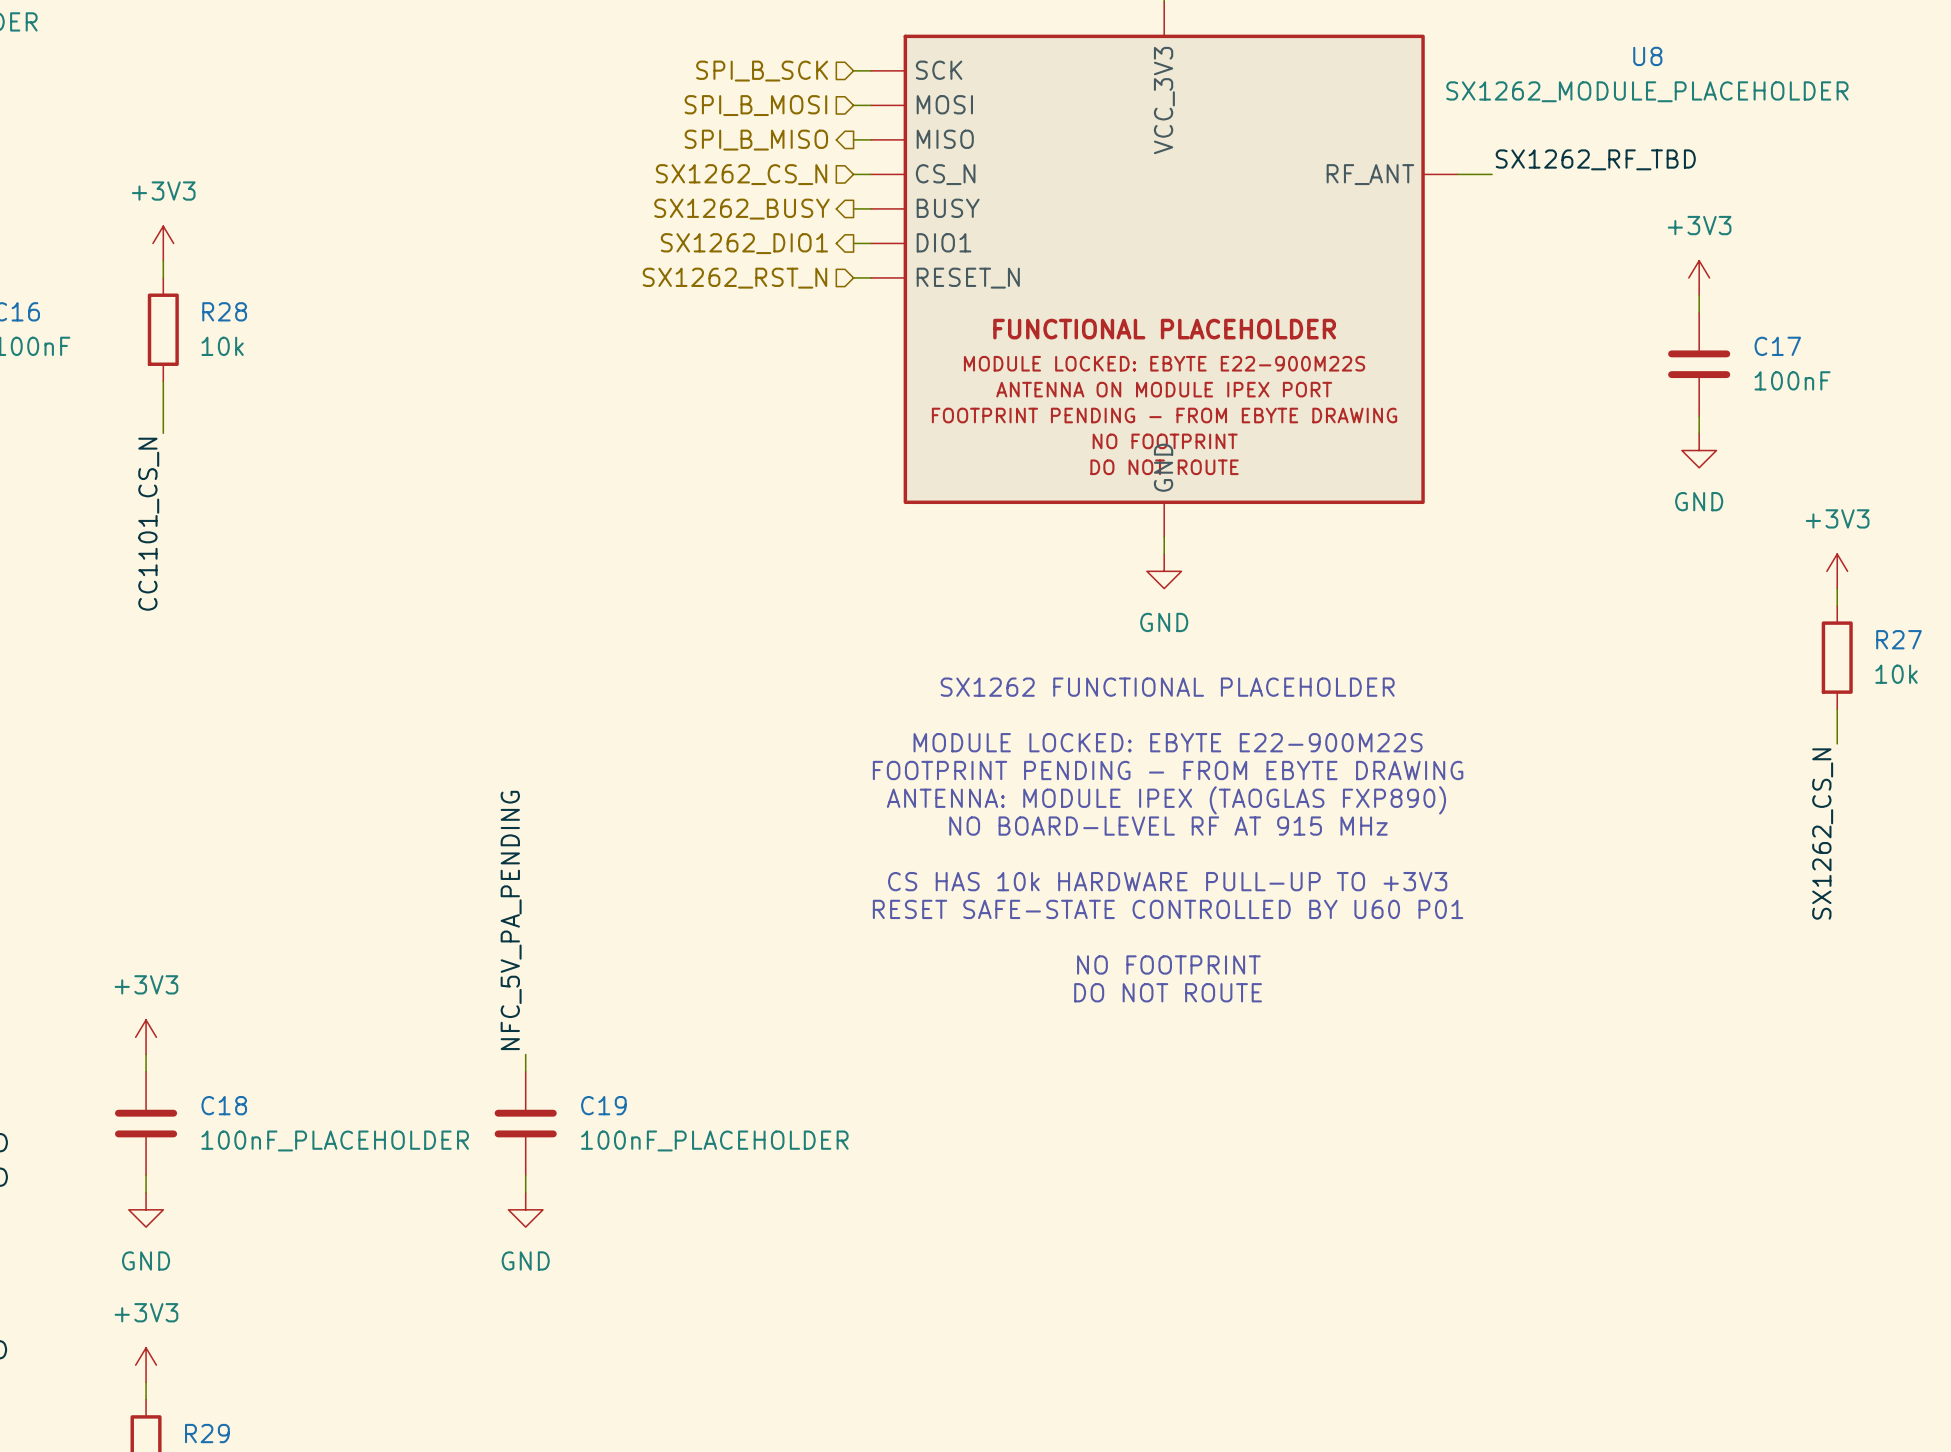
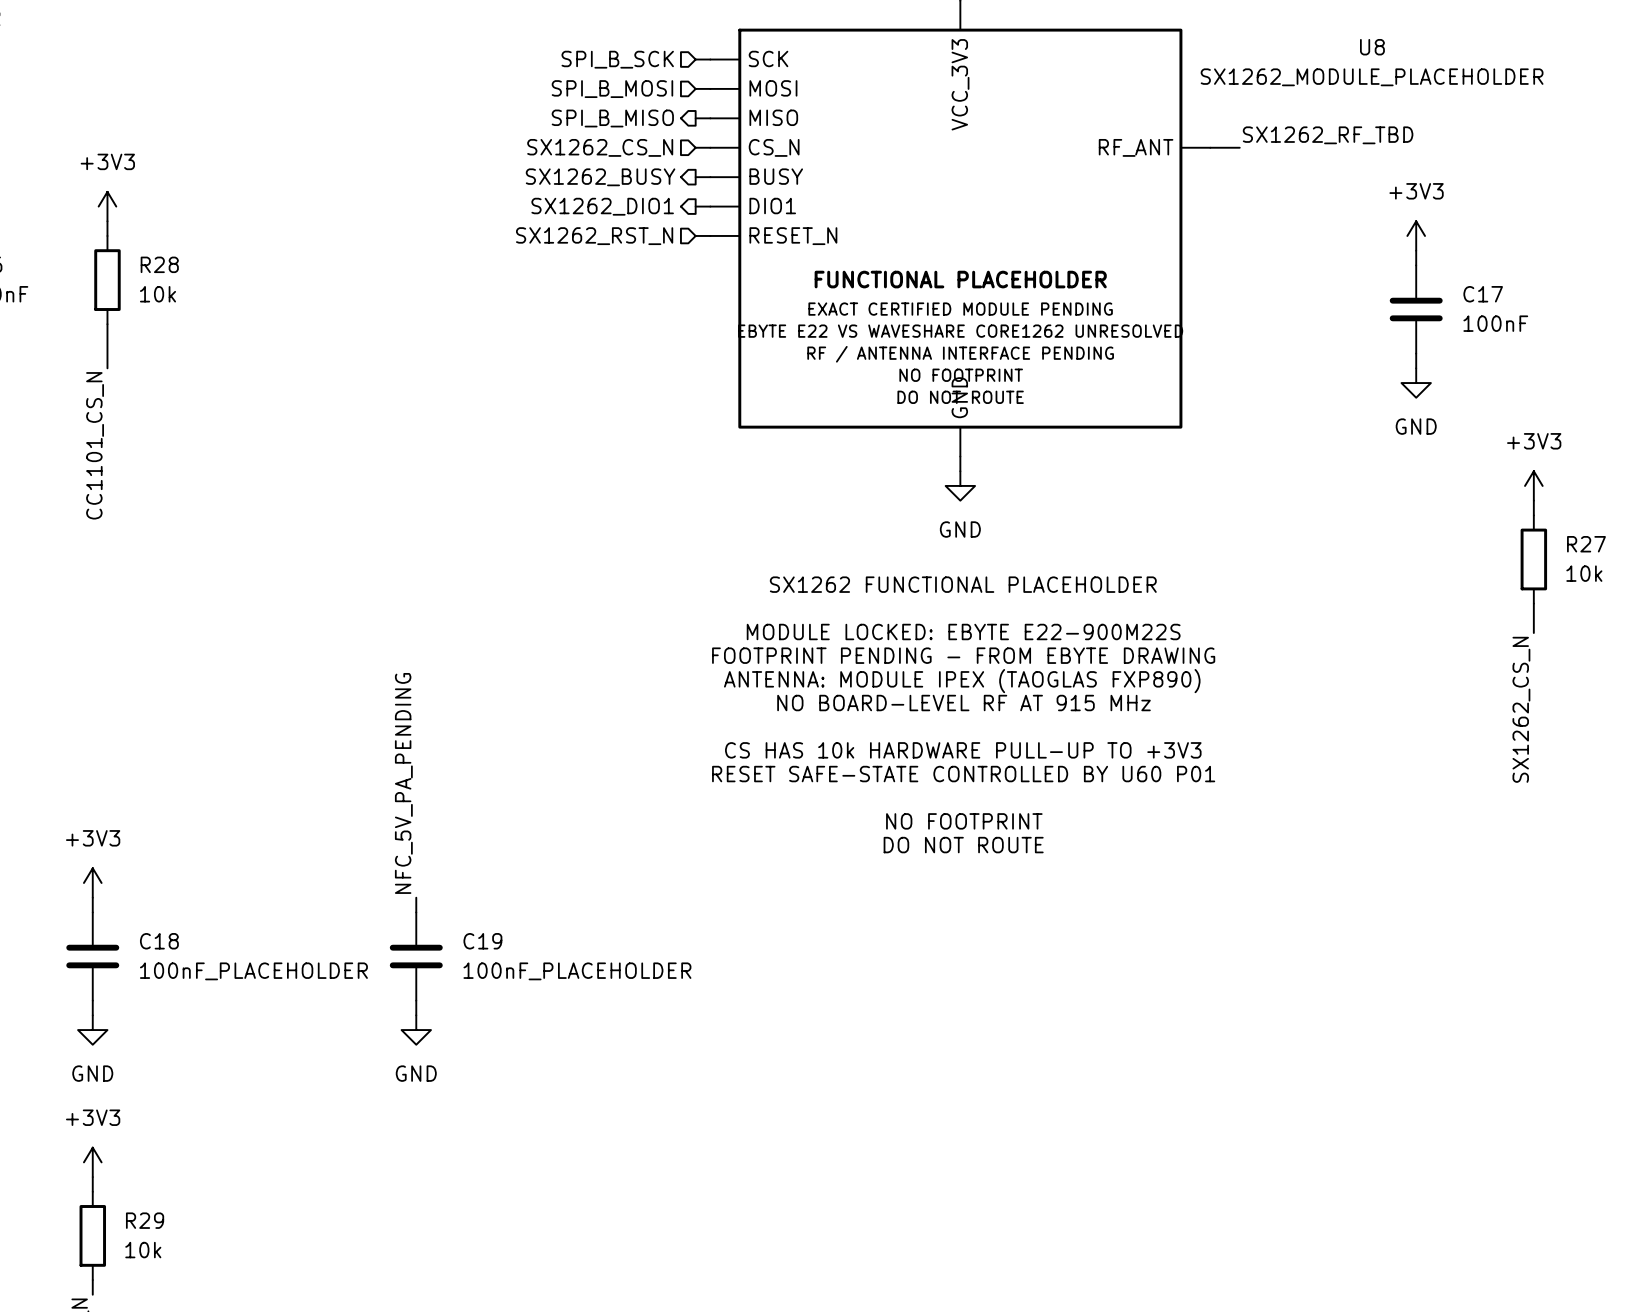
U8 text: MODULE LOCKED: EBYTE E22-900M22S (1164, 363) -> EXACT CERTIFIED MODULE PENDING (960, 309)
U8 text: ANTENNA ON MODULE IPEX PORT (1164, 389) -> EBYTE E22 VS WAVESHARE CORE1262 UNRESOLVED (960, 331)
U8 text: FOOTPRINT PENDING - FROM EBYTE DRAWING (1164, 415) -> RF / ANTENNA INTERFACE PENDING (960, 354)

